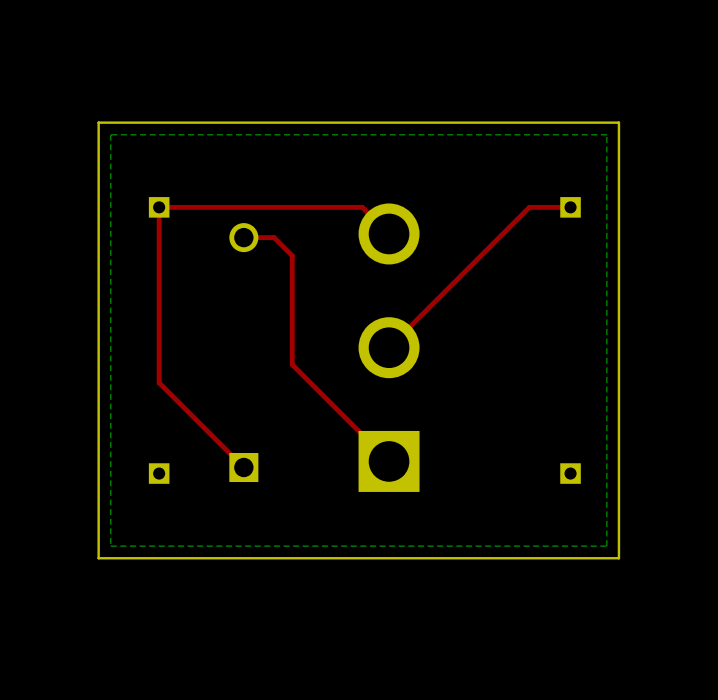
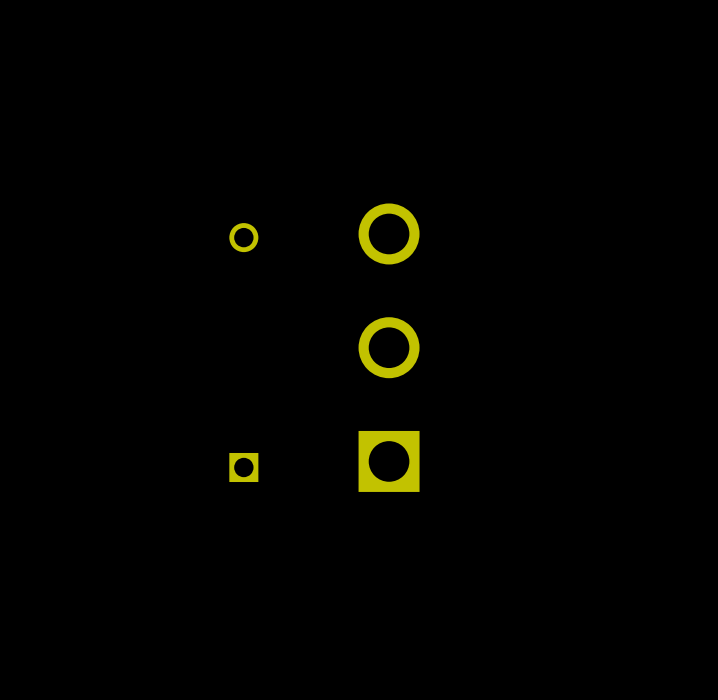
board edge: (618, 122) (98, 122) (98, 558) (618, 558) (618, 122) -> none
bottom zone outline: (606, 134) (606, 546) (110, 546) (110, 134) (606, 134) -> none
part: (159, 207) -> none
top track: (570, 207) (529, 207) (389, 347) -> none
part: (570, 207) -> none
top track: (389, 233) (362, 207) (159, 207) (159, 382) (243, 467) -> none
top track: (243, 237) (274, 237) (292, 255) (292, 364) (389, 461) -> none
part: (159, 473) -> none
part: (570, 473) -> none

